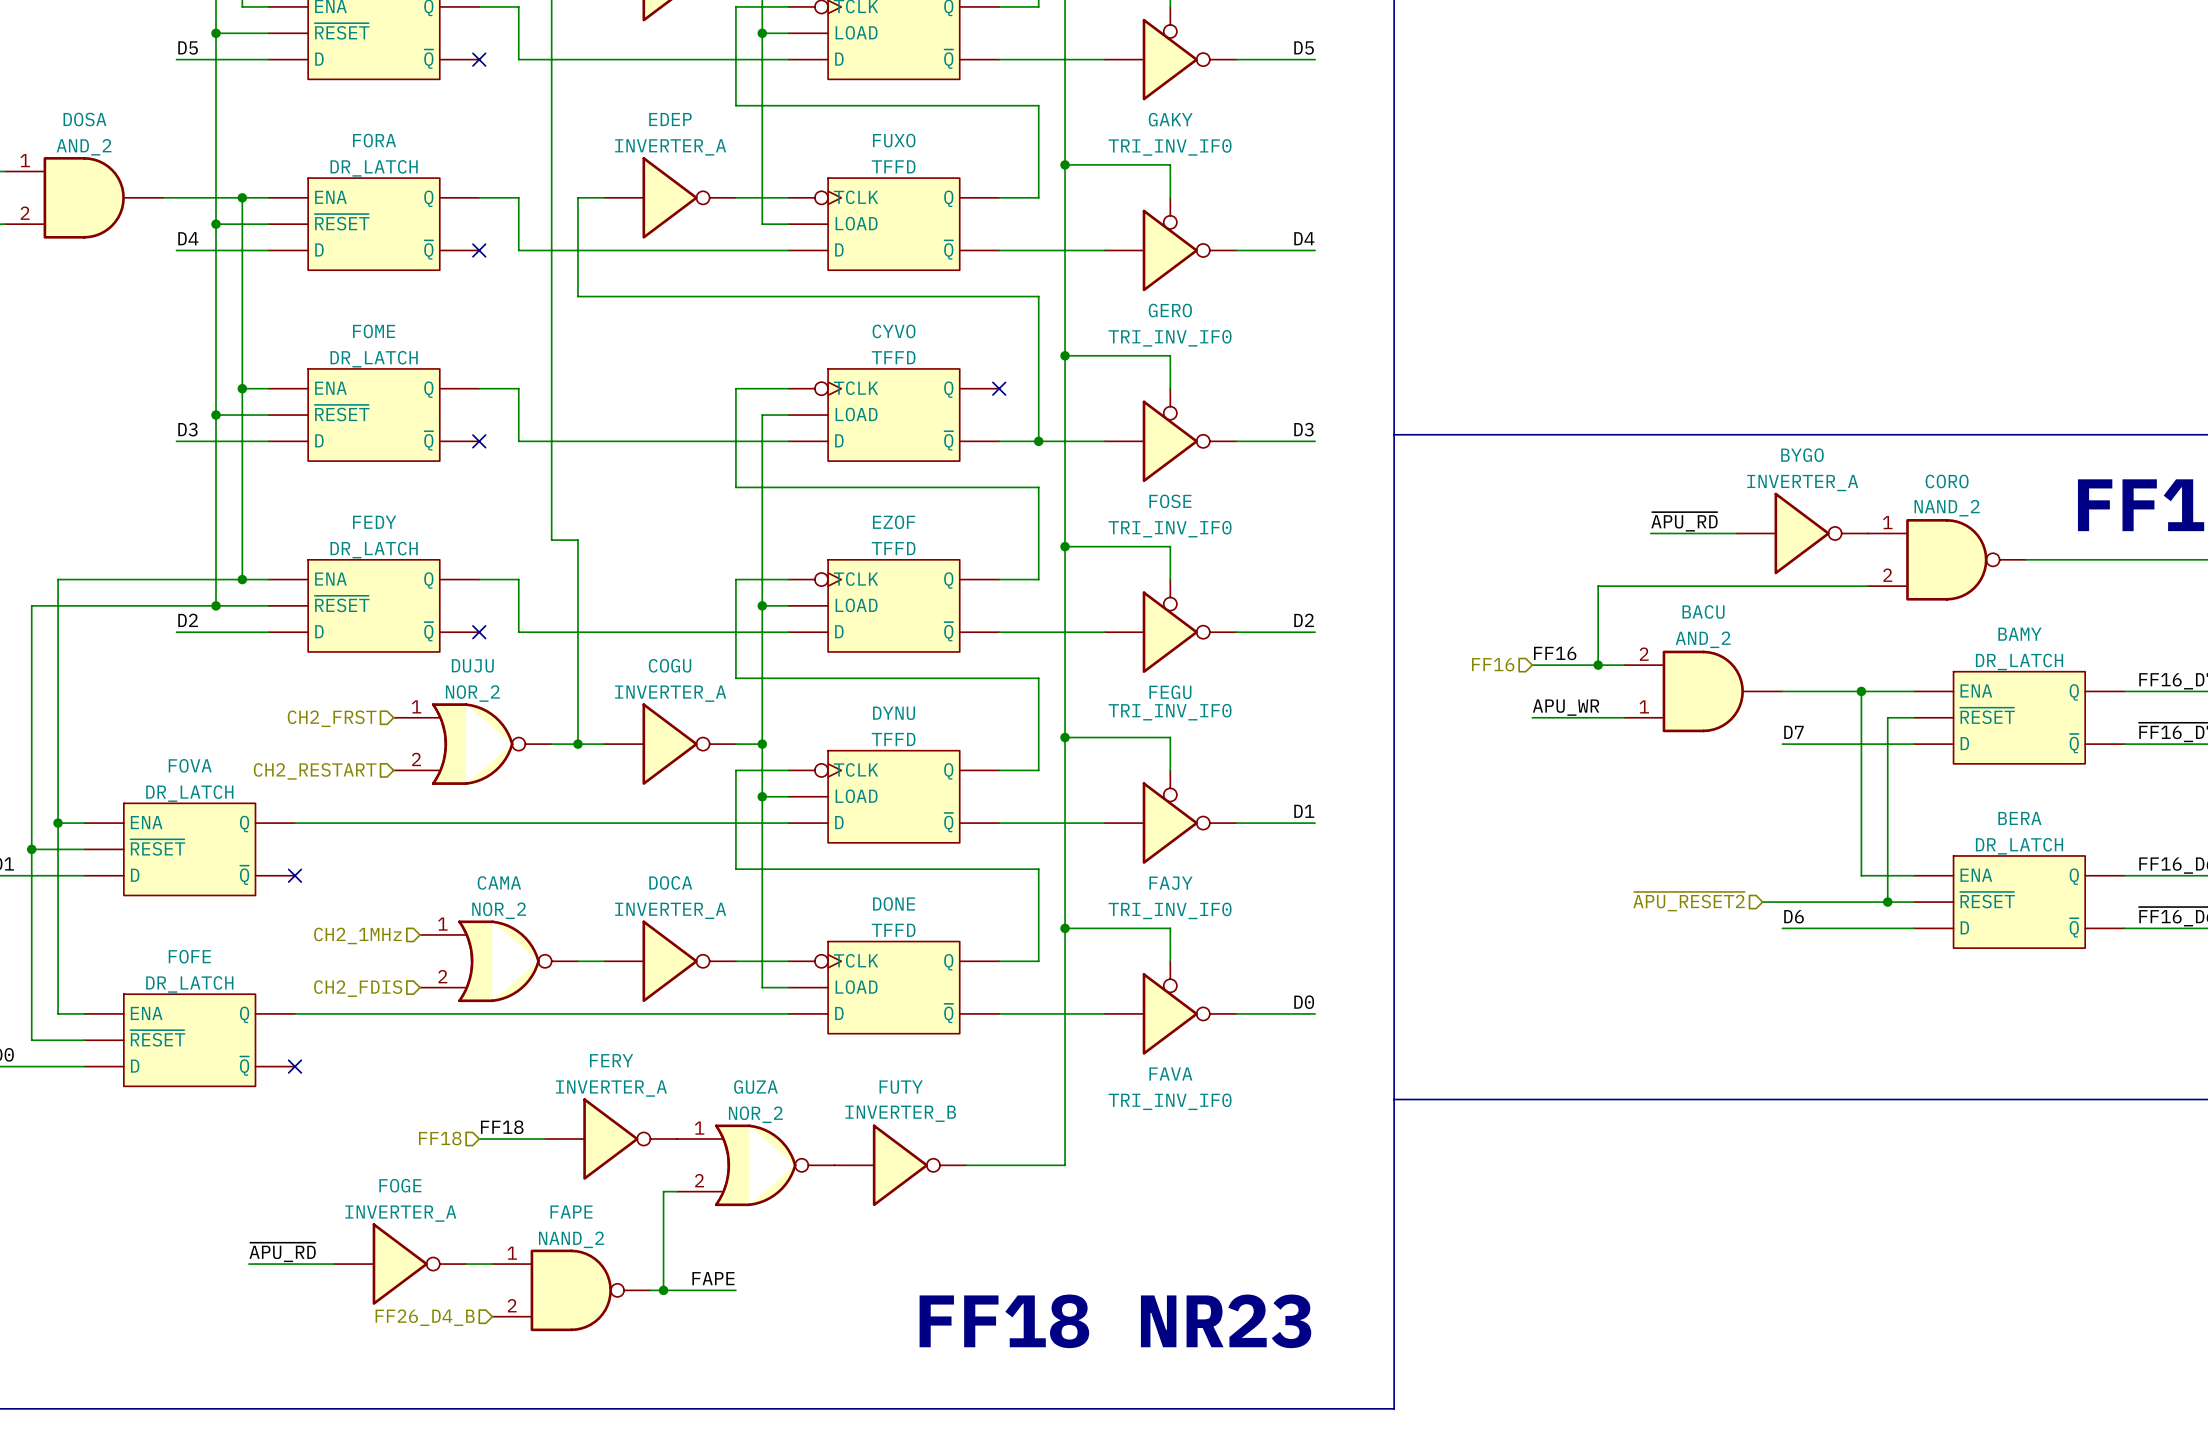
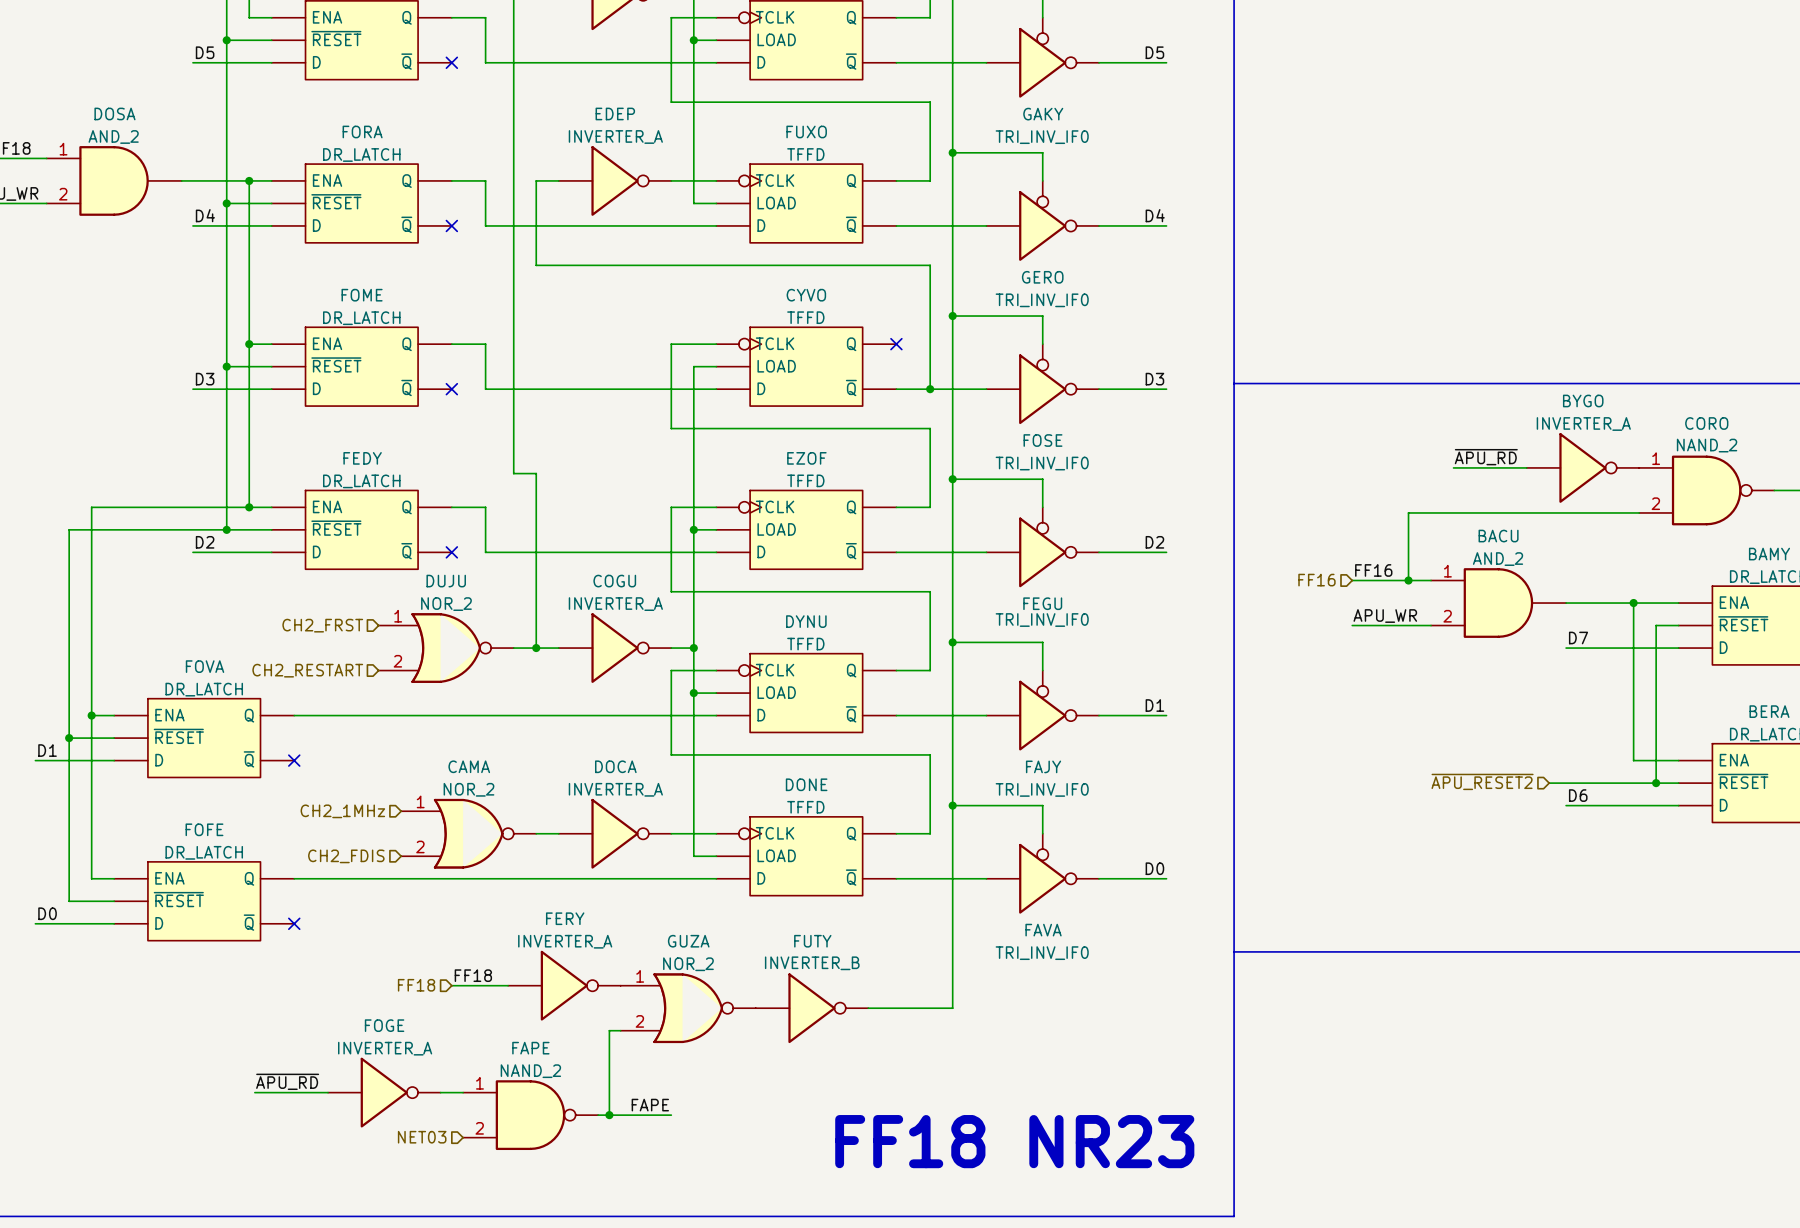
BACU flip: as is (1703, 691) -> up-down (1498, 603)
hierarchical label: FF26_D4_B (425, 1317) -> NET03 (422, 1137)

